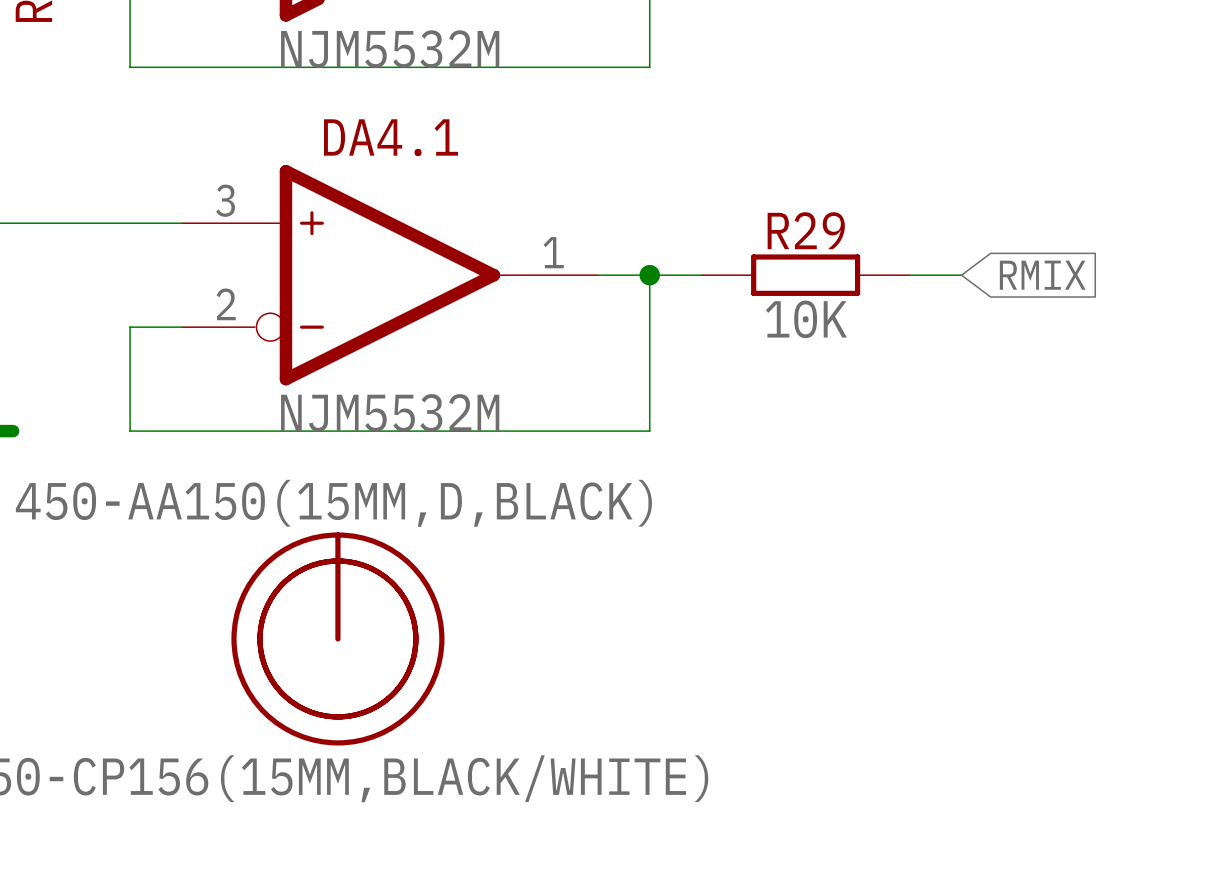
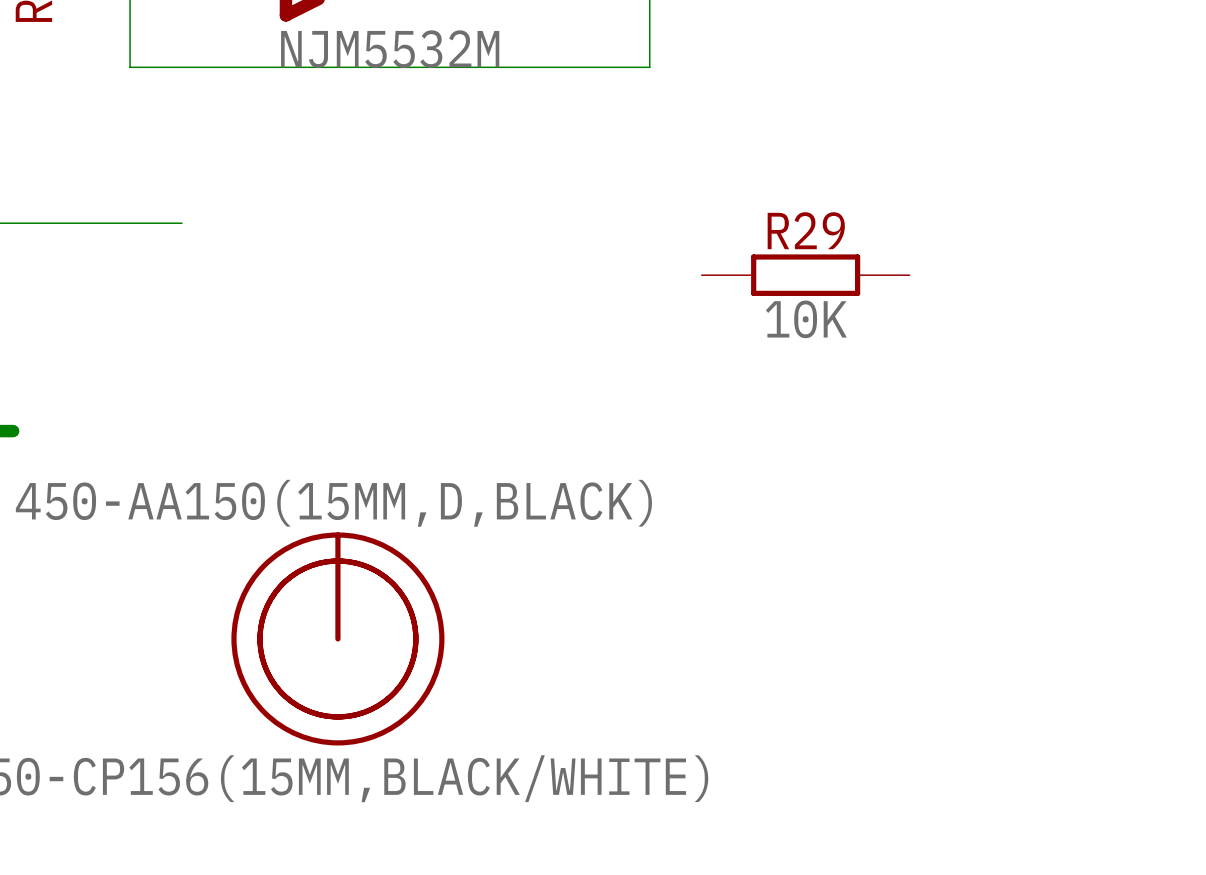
DA4.1: NJM5532M (389, 275) -> none
wire: (597, 275) (701, 275) -> none
wire: (649, 275) (649, 431) (130, 431) (130, 327) (182, 327) -> none
junction: (649, 275) -> none
wire: (909, 275) (961, 275) -> none
global label: RMIX (1042, 275) -> none

